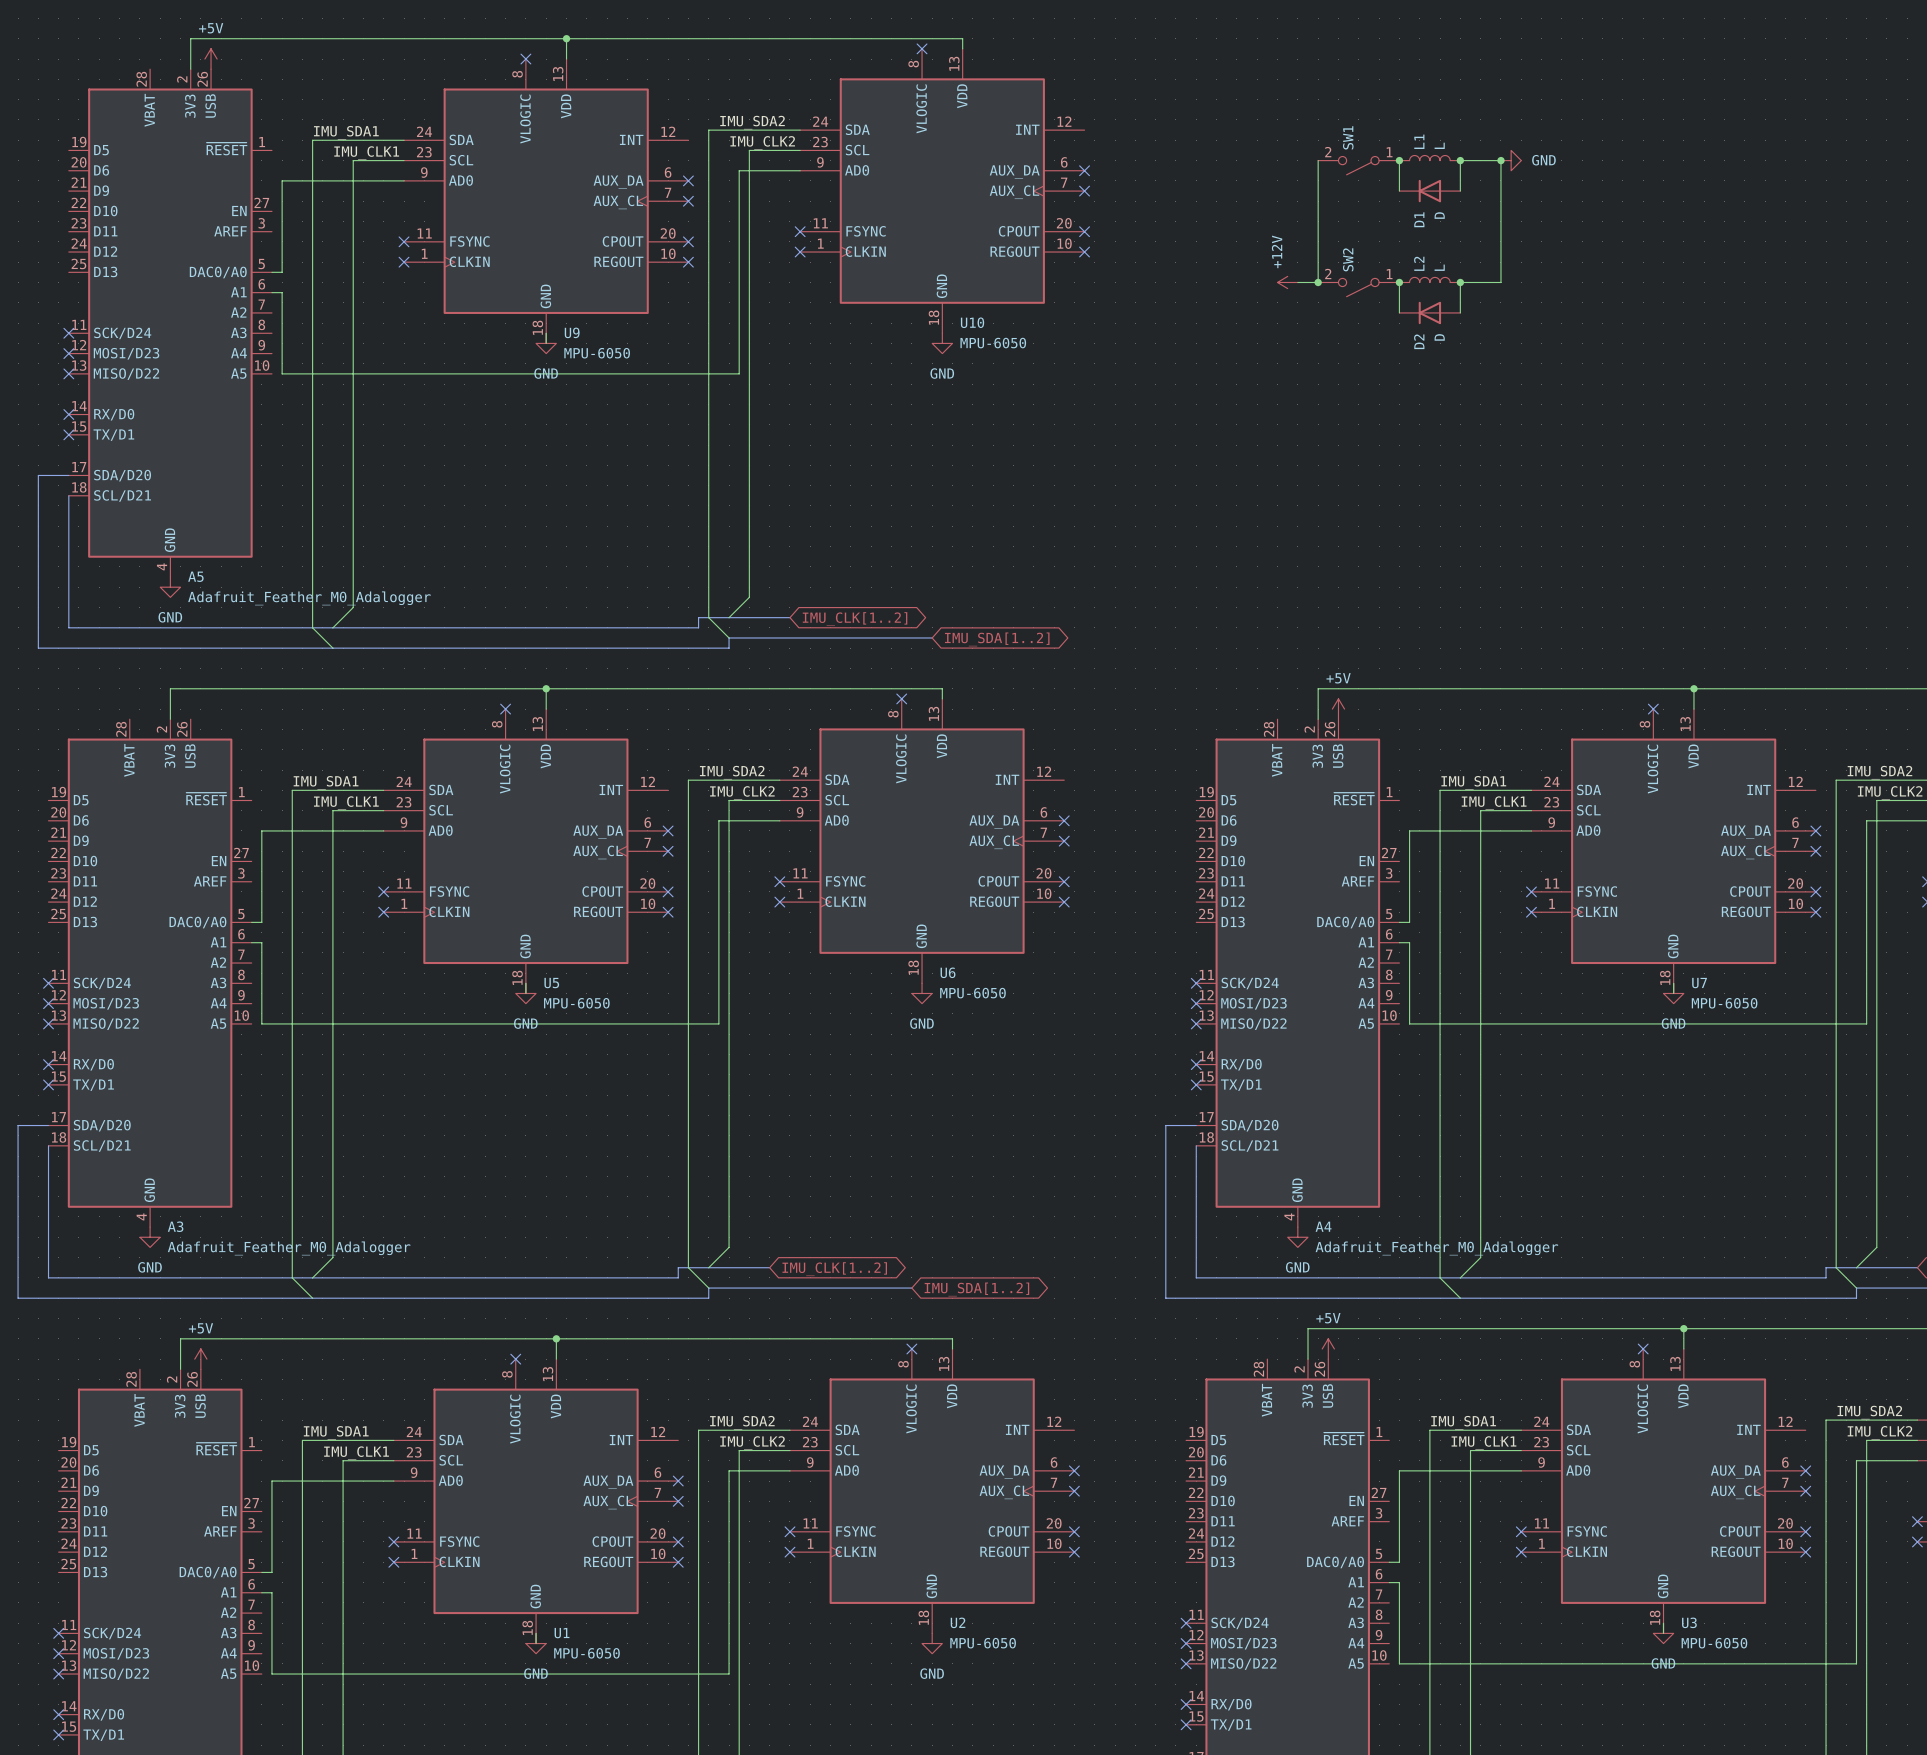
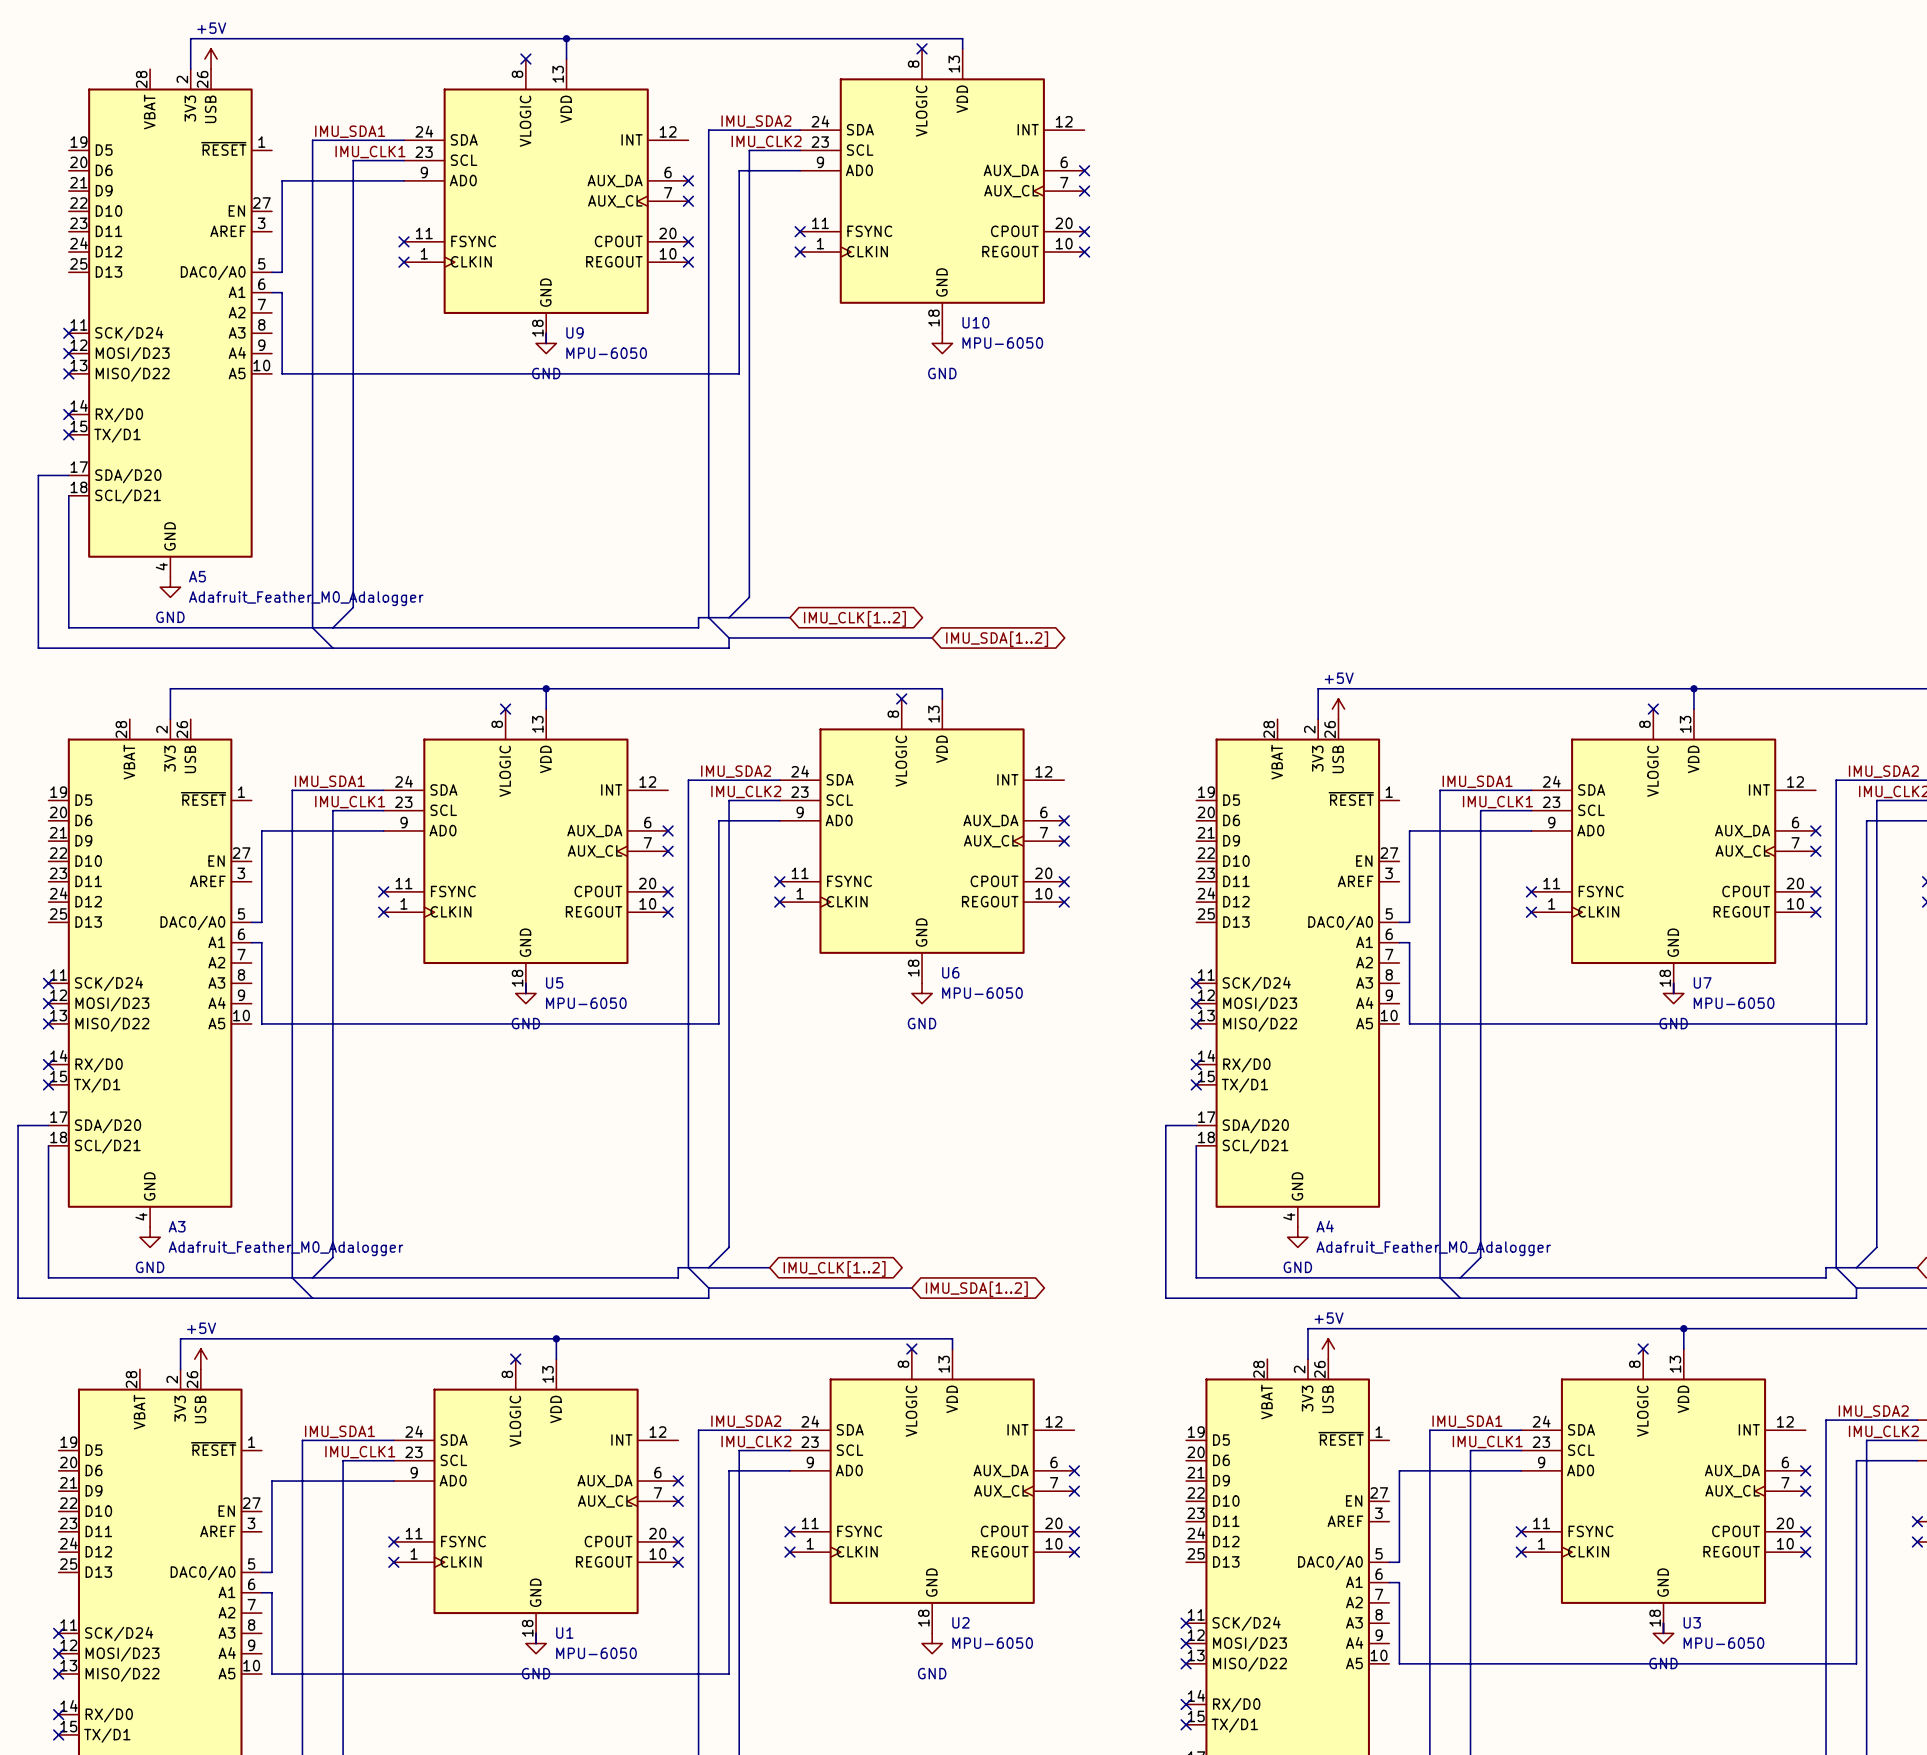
L1: L (1429, 158) -> none
wire: (1318, 160) (1318, 282) (1297, 282) -> none
wire: (1399, 160) (1399, 191) -> none
junction: (1399, 160) -> none
junction: (1460, 160) -> none
junction: (1500, 160) -> none
power symbol: GND (1511, 160) -> none
SW1: (1358, 165) -> none
D1: D (1429, 191) -> none
wire: (1460, 191) (1460, 160) (1500, 160) (1500, 282) (1460, 282) (1460, 312) -> none
L2: L (1429, 279) -> none
power symbol: +12V (1287, 282) -> none
junction: (1318, 282) -> none
wire: (1399, 282) (1399, 312) -> none
junction: (1399, 282) -> none
junction: (1460, 282) -> none
SW2: (1358, 287) -> none
D2: D (1429, 312) -> none

